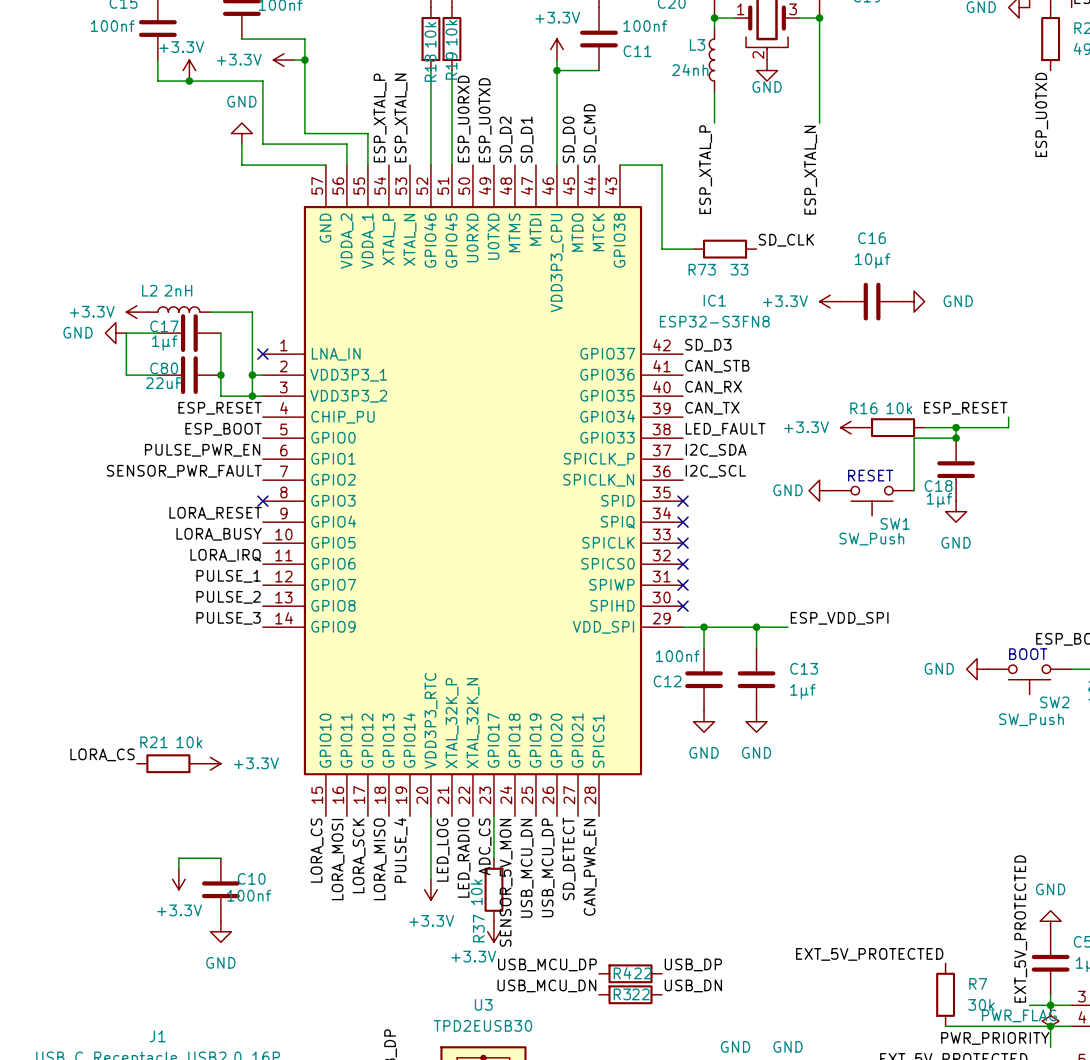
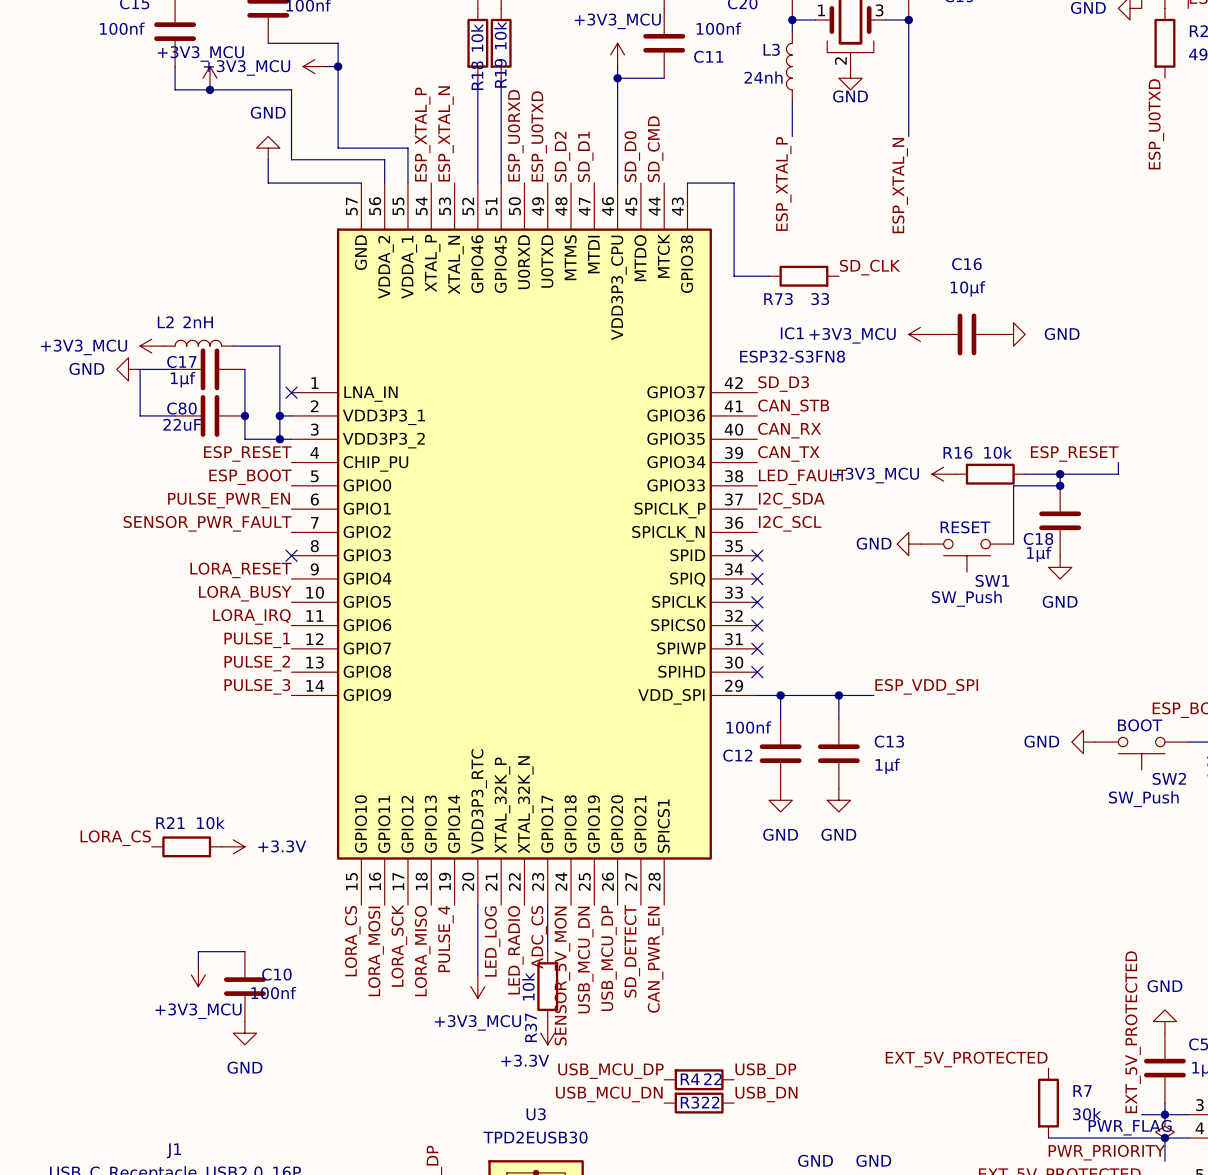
power symbol: +3.3V (556, 49) -> +3V3_MCU (617, 54)
power symbol: +3.3V (283, 60) -> +3V3_MCU (314, 66)
power symbol: +3.3V (189, 70) -> +3V3_MCU (210, 78)
power symbol: +3.3V (830, 301) -> +3V3_MCU (920, 334)
power symbol: +3.3V (136, 312) -> +3V3_MCU (151, 346)
power symbol: +3.3V (851, 427) -> +3V3_MCU (943, 474)
power symbol: +3.3V (178, 879) -> +3V3_MCU (198, 974)
power symbol: +3.3V (430, 889) -> +3V3_MCU (477, 986)

